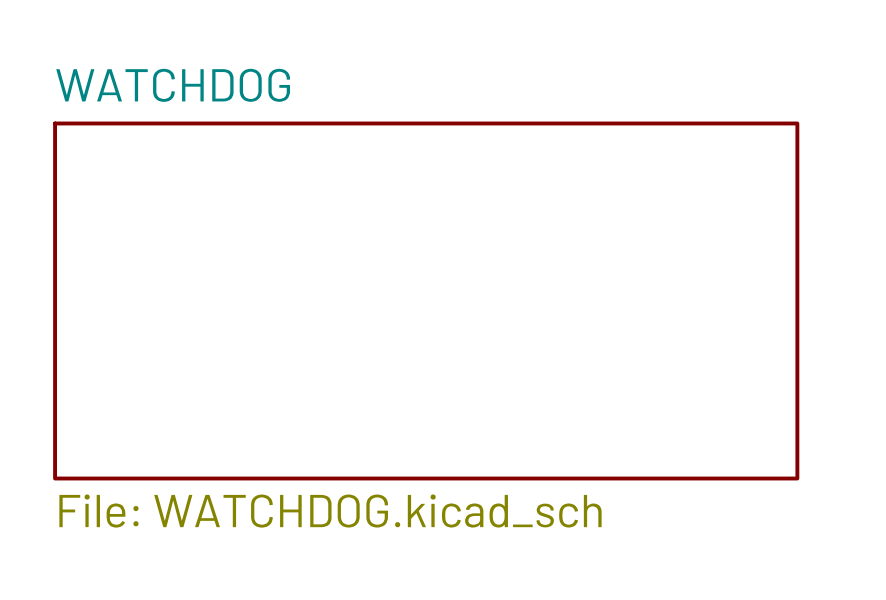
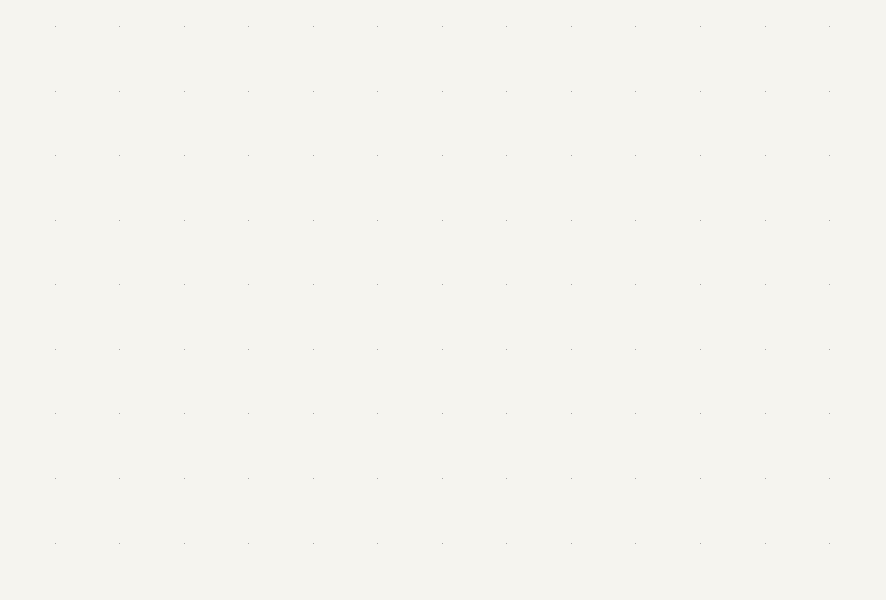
sheet WATCHDOG: File: WATCHDOG.kicad_sch (426, 301) -> none

